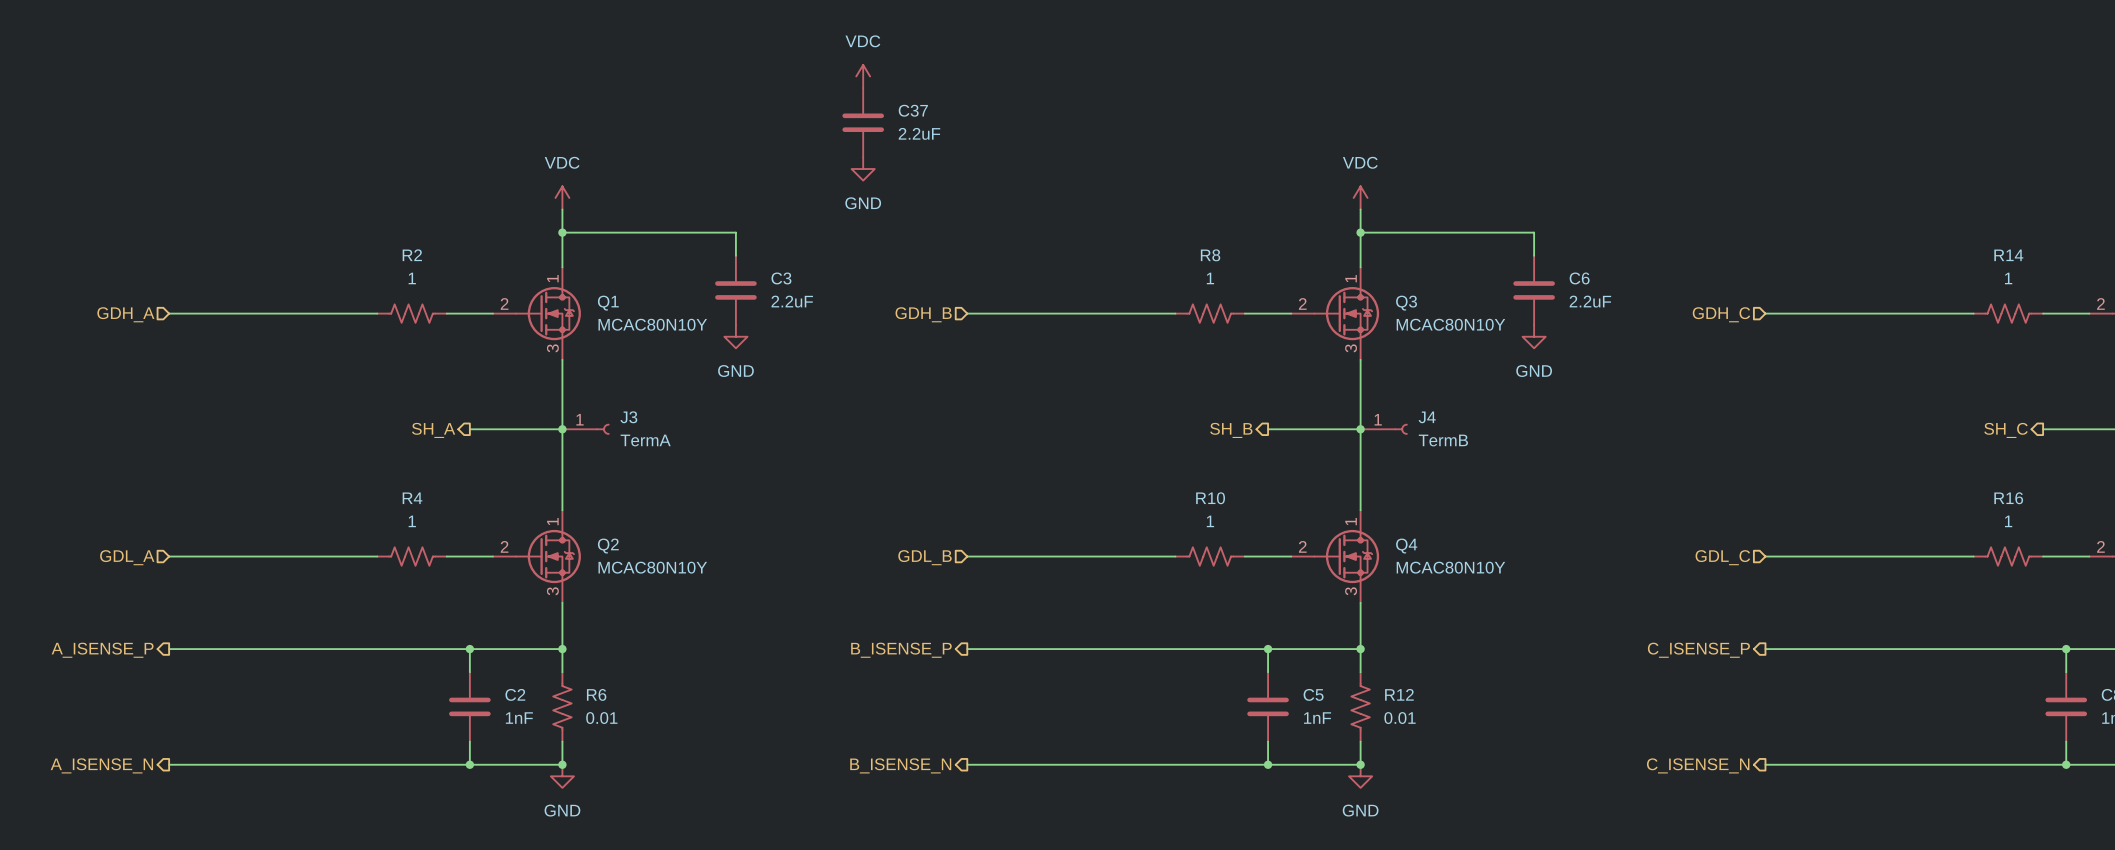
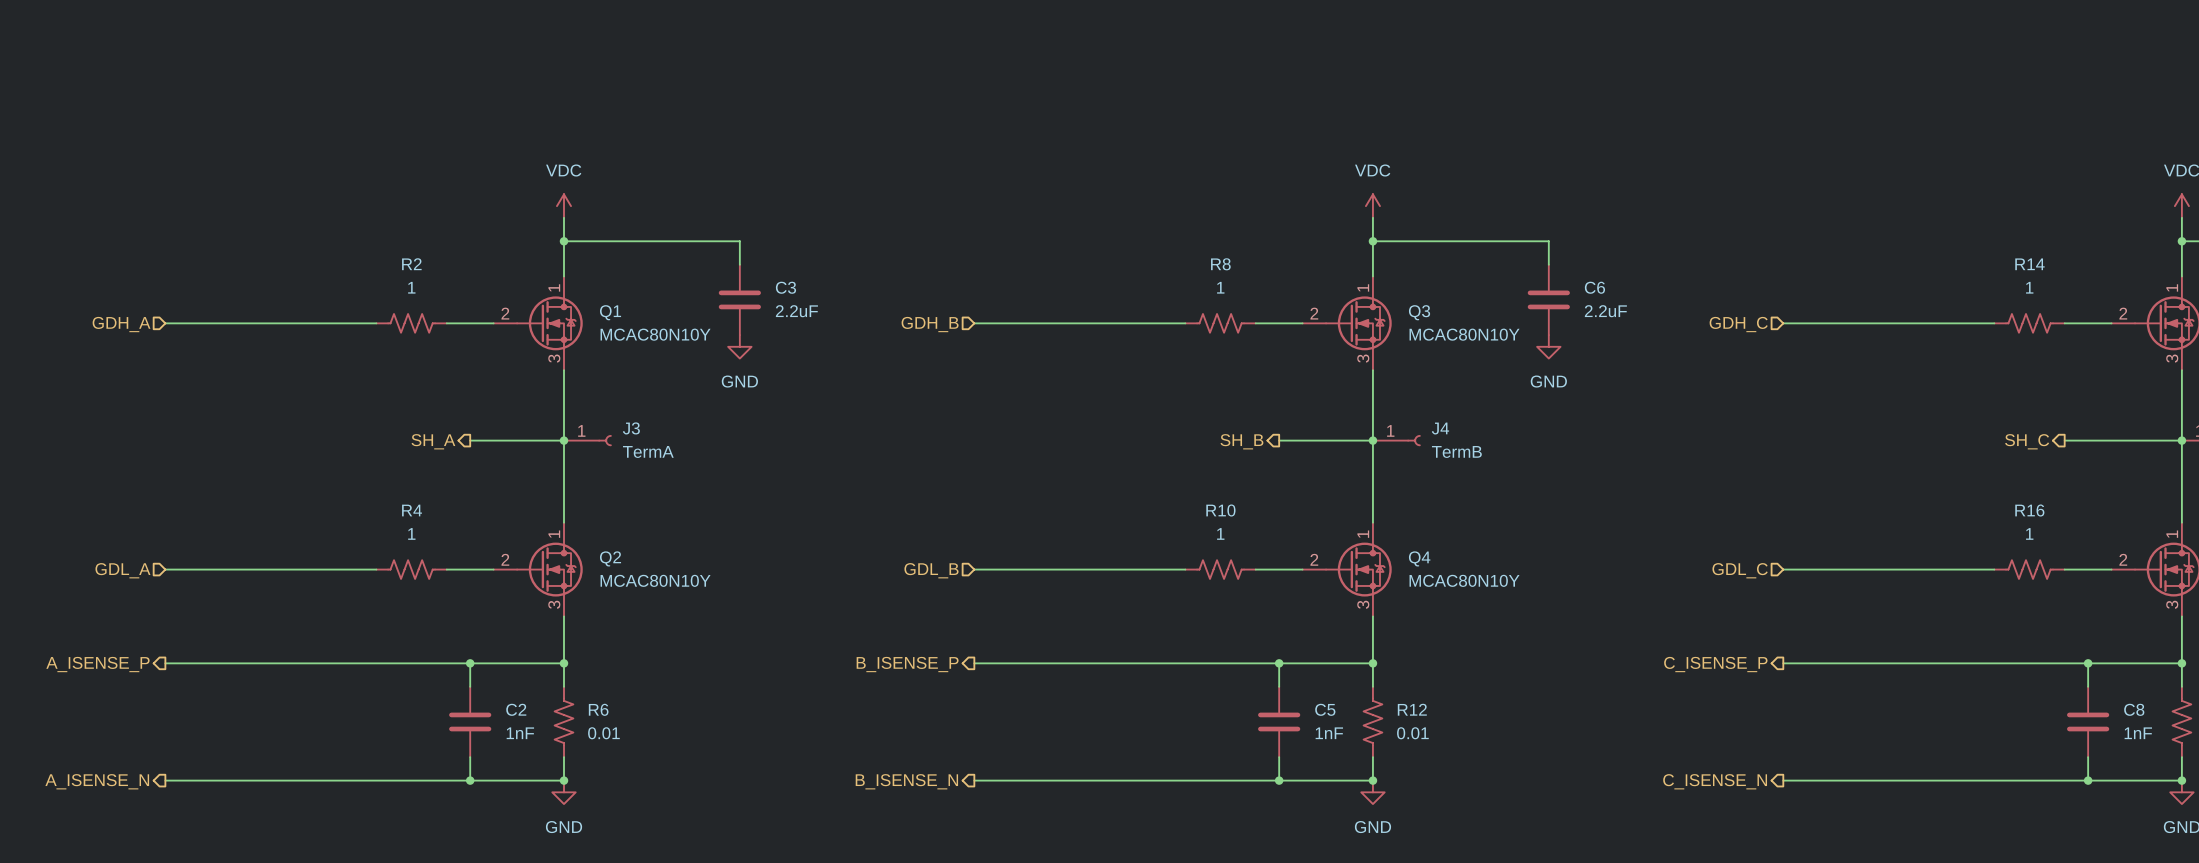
power symbol: VDC (863, 76) -> none
C37: 2.2uF (863, 122) -> none
power symbol: GND (863, 169) -> none

